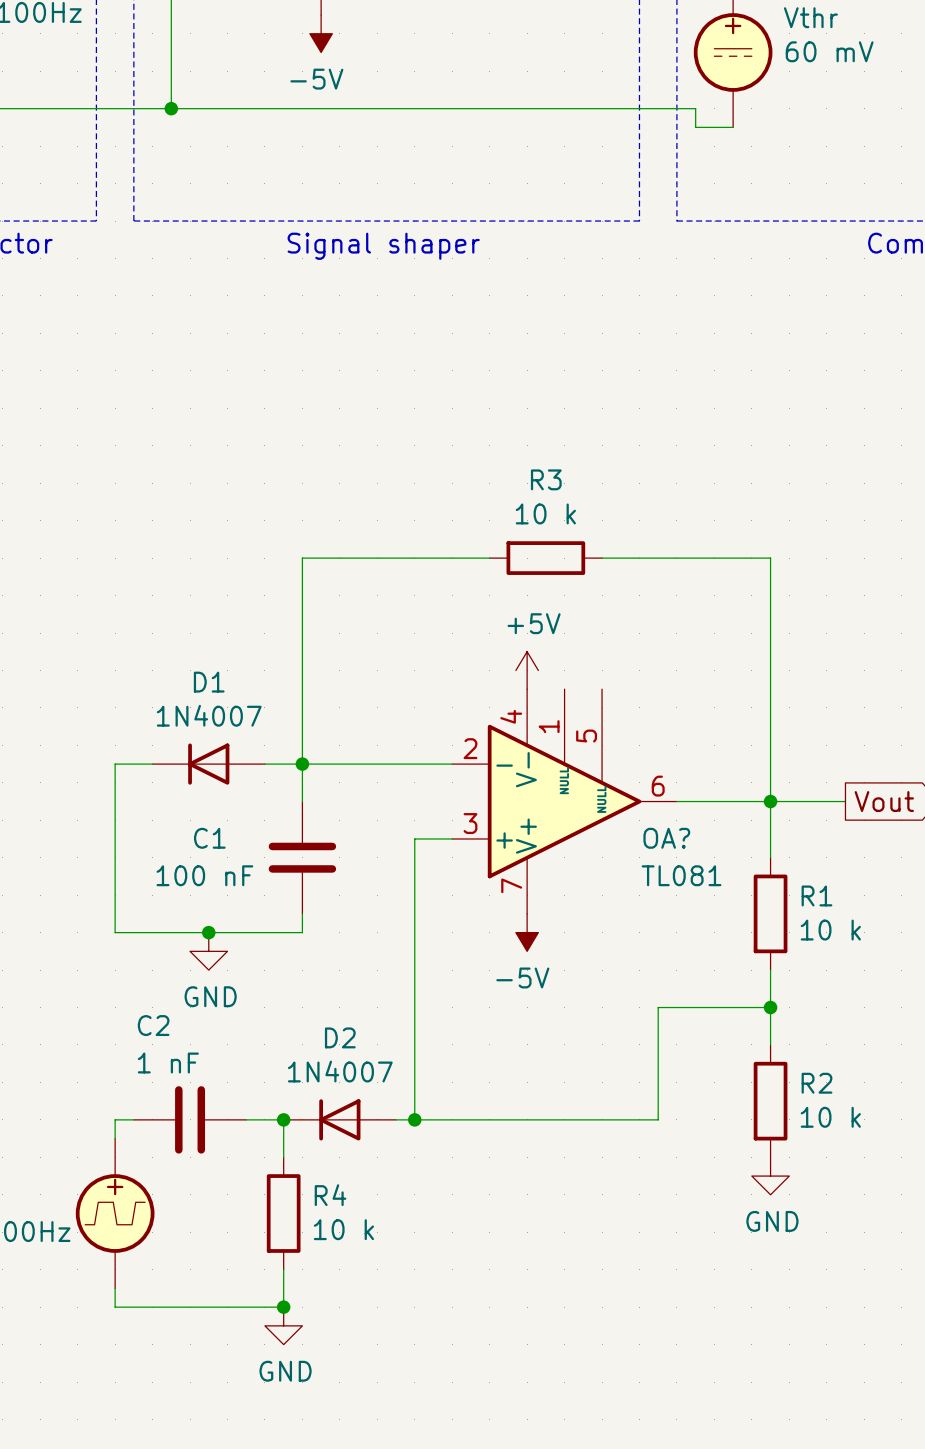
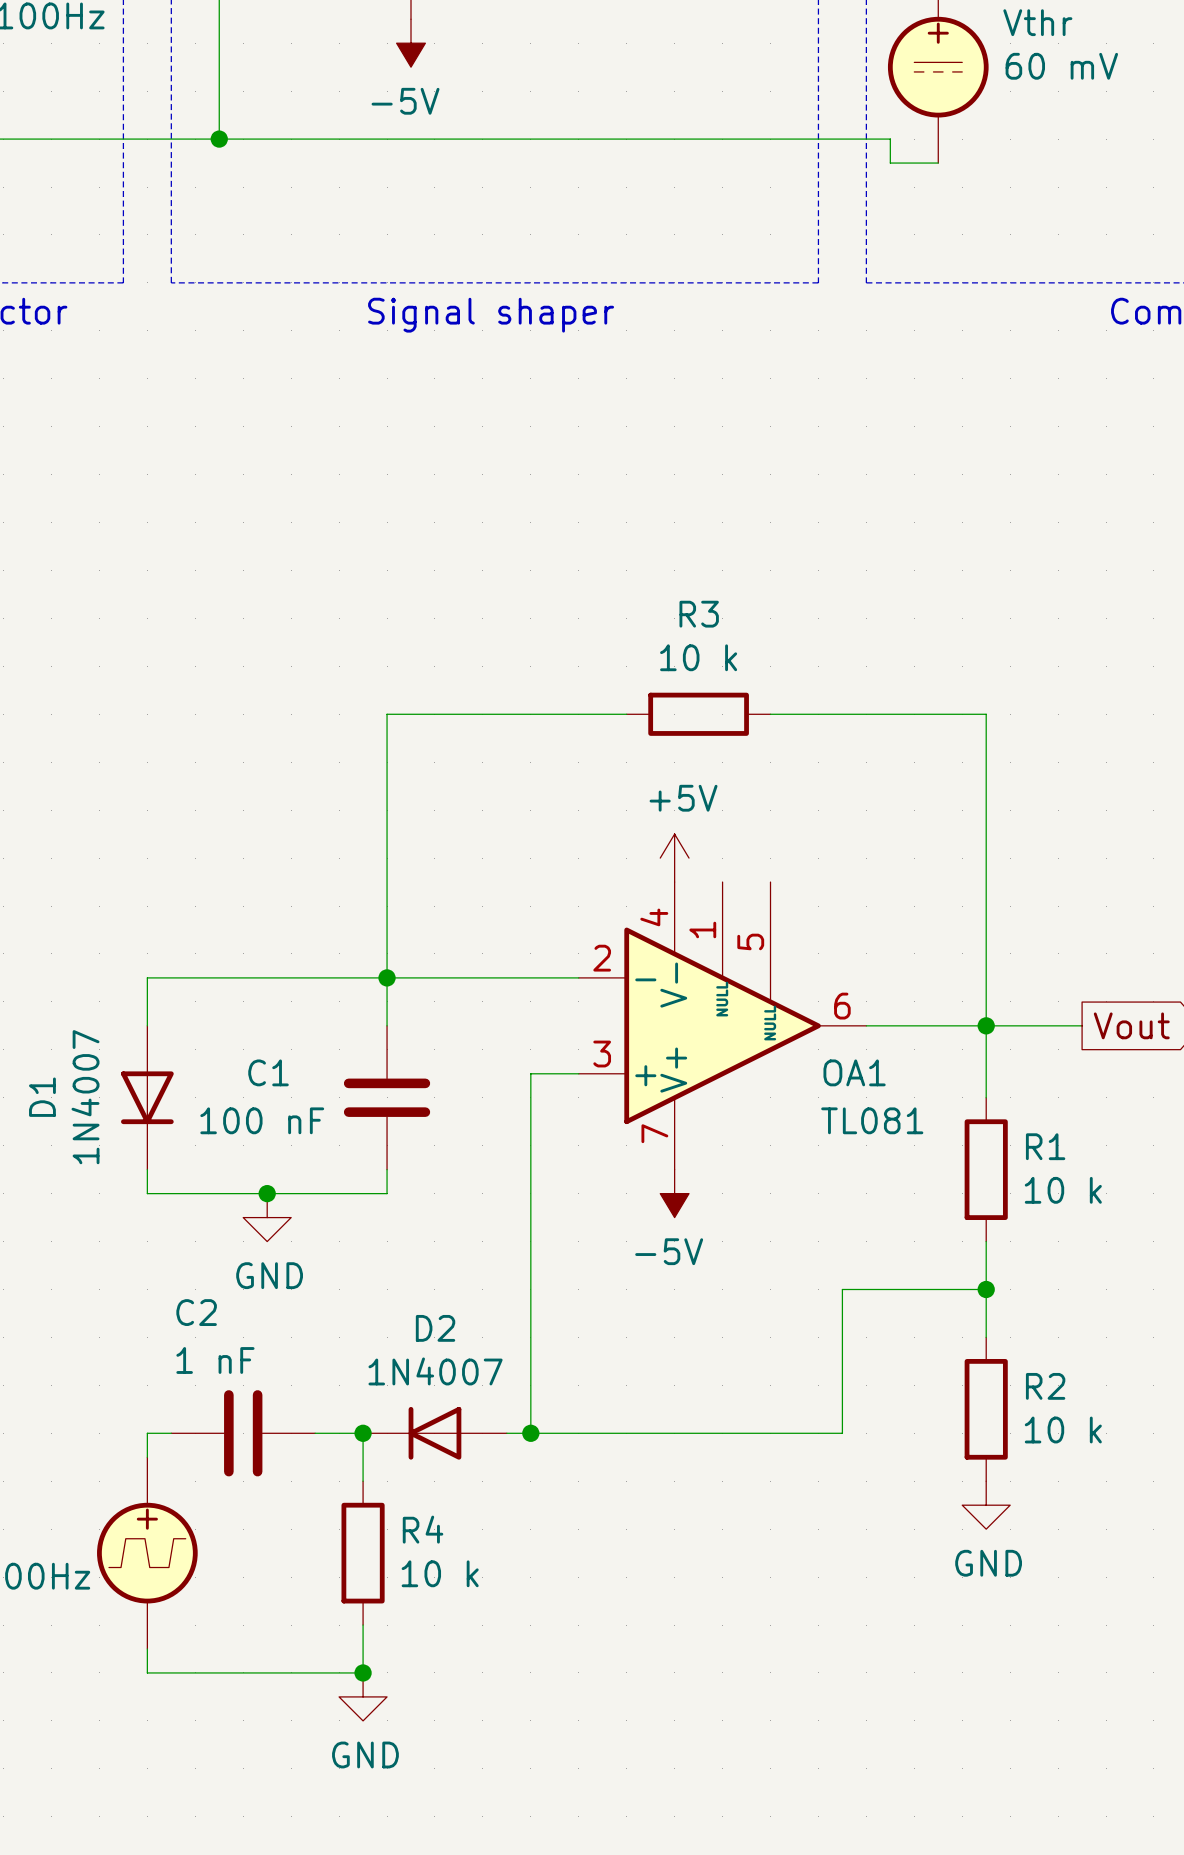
D1 rotation: 0° (208, 764) -> 90° counterclockwise (147, 1097)
D1 position: (208, 764) -> (147, 1097)
OA? name: OA? (666, 838) -> OA1 (854, 1072)

